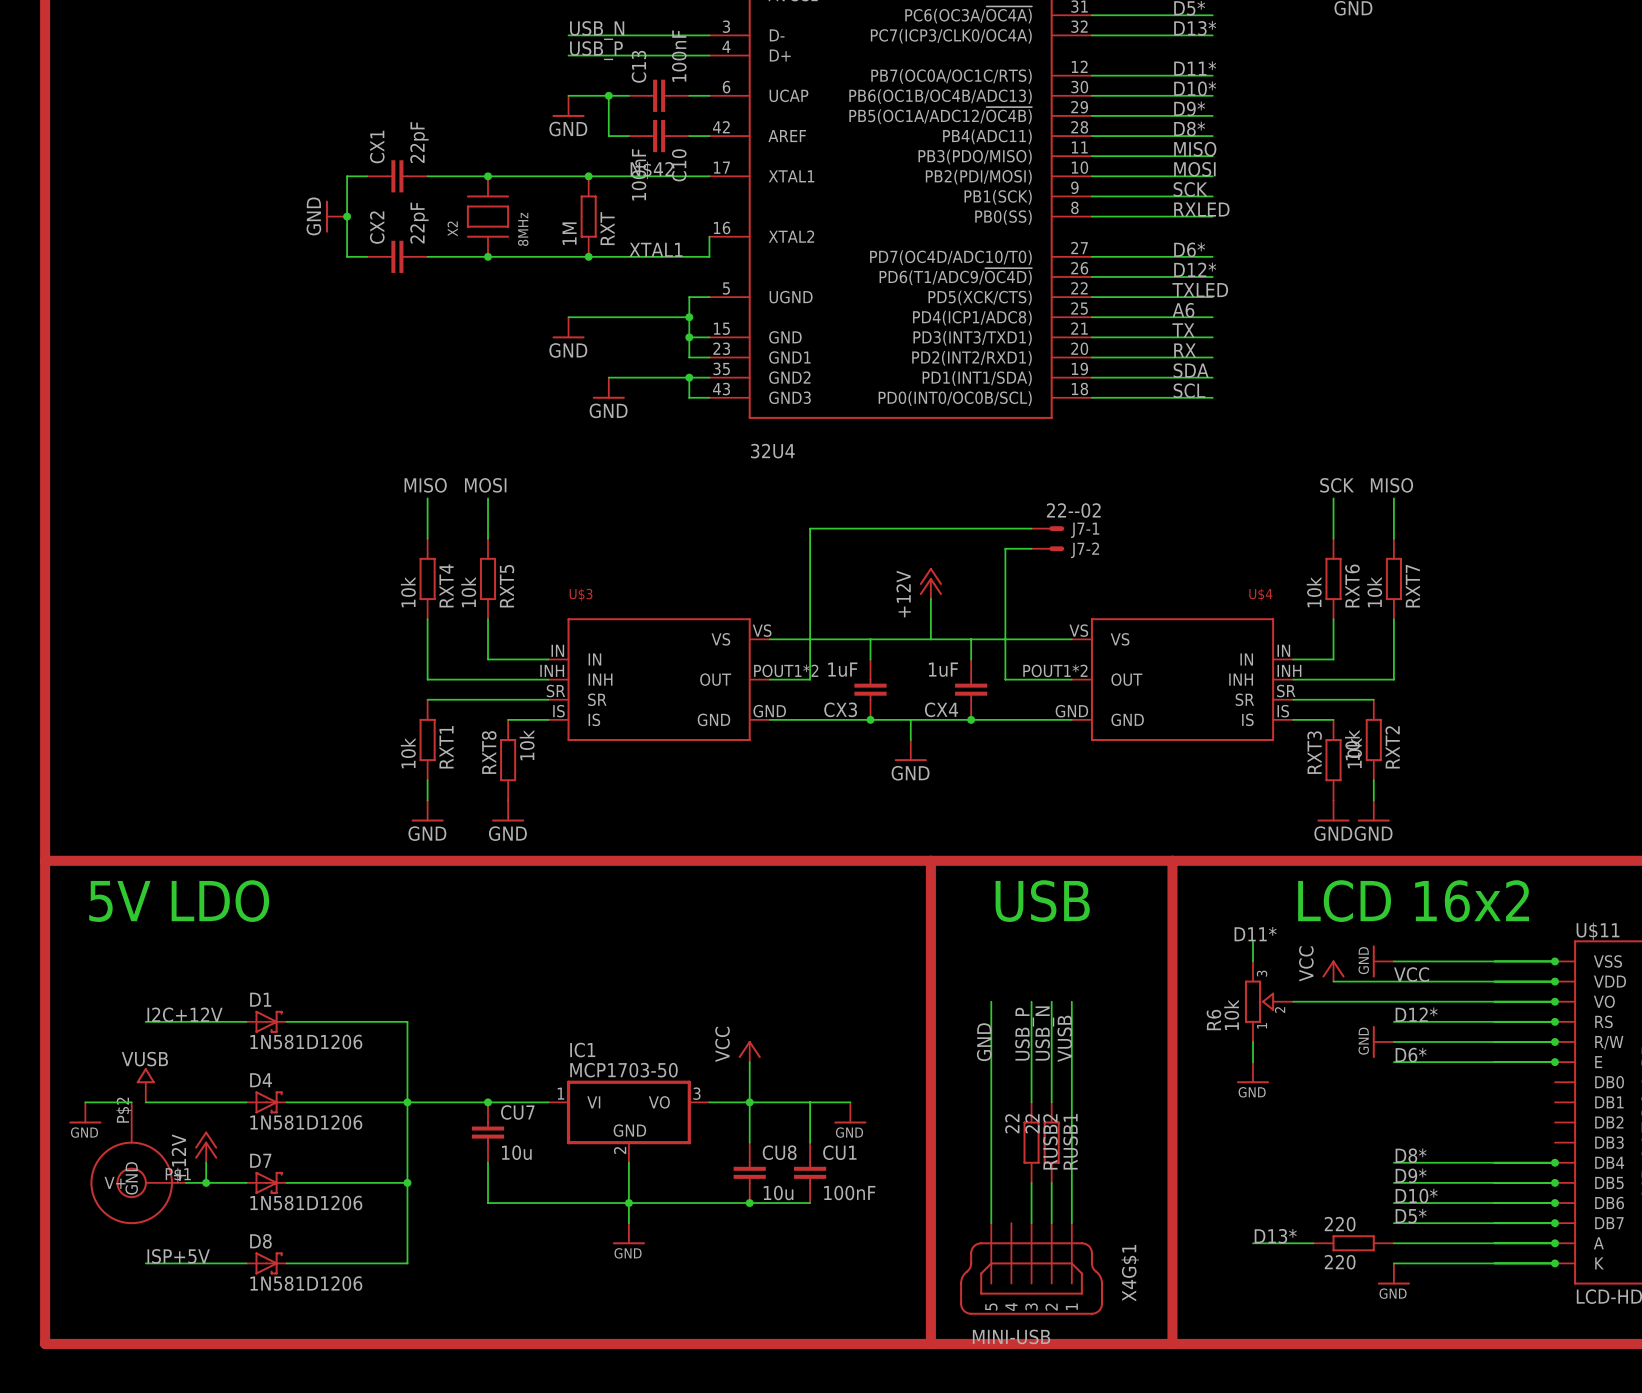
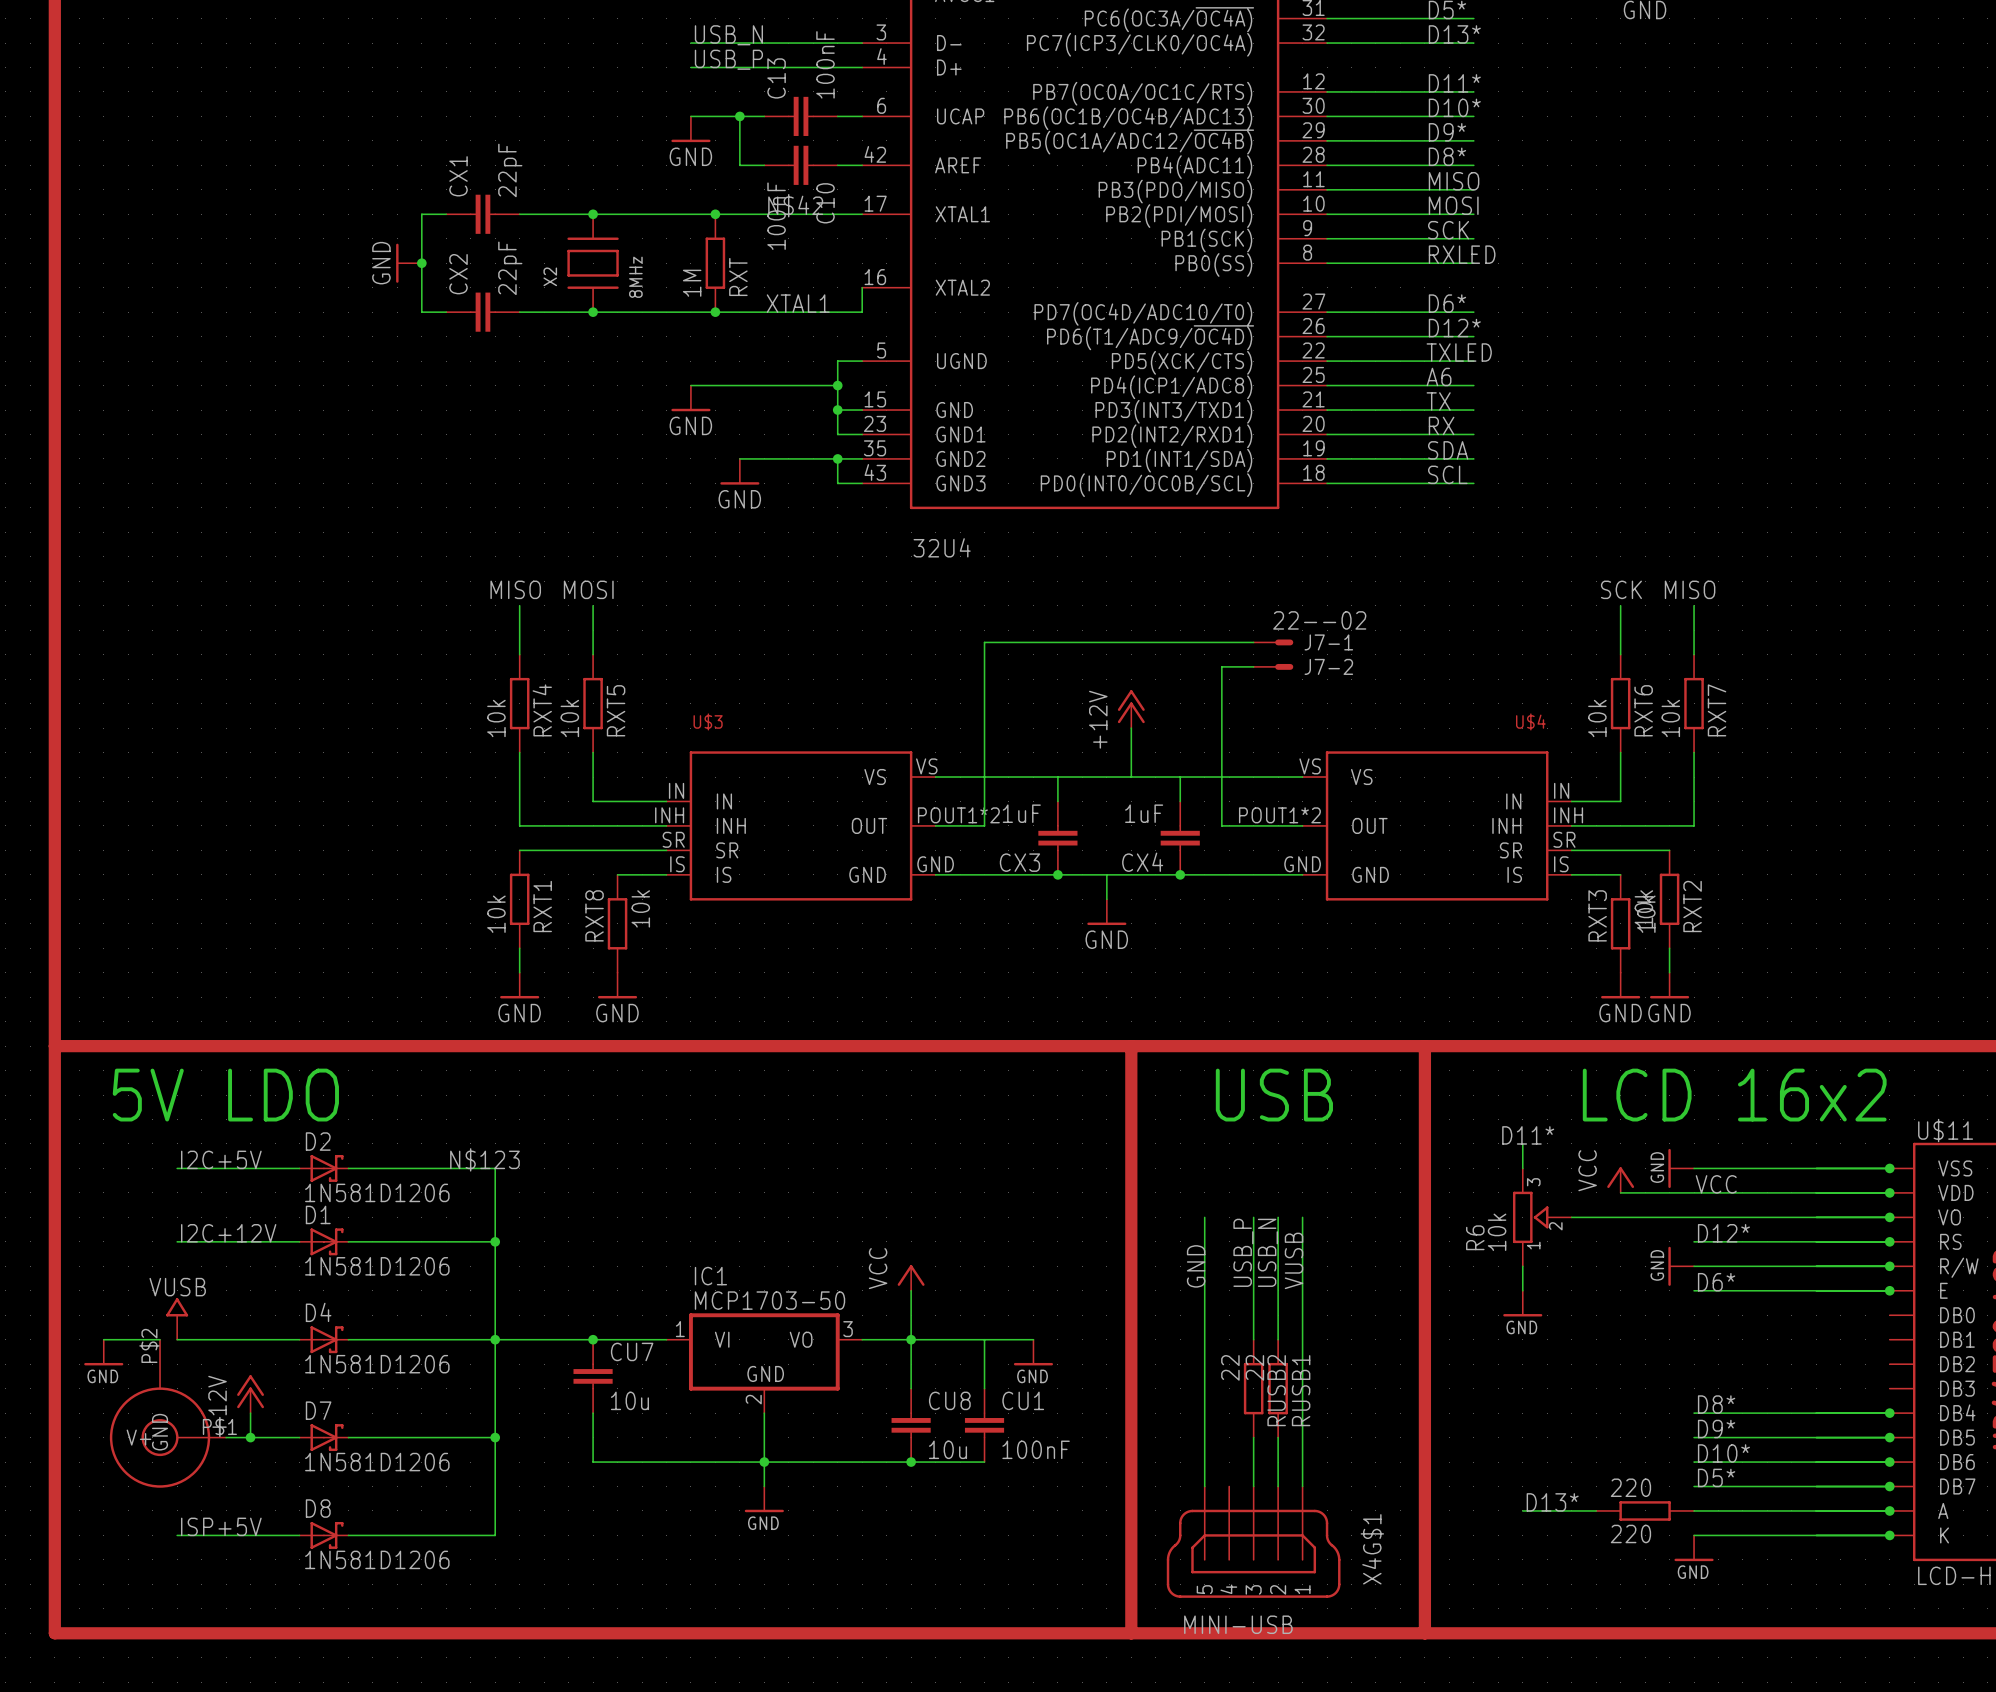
label: none -> I2C+5V (221, 1159)
label: none -> N$123 (484, 1159)
wire: none -> (177, 1168) (299, 1168)
D2: none -> 1N581D1206 (323, 1168)
wire: none -> (348, 1168) (495, 1168) (495, 1241)
junction: none -> (495, 1241)

